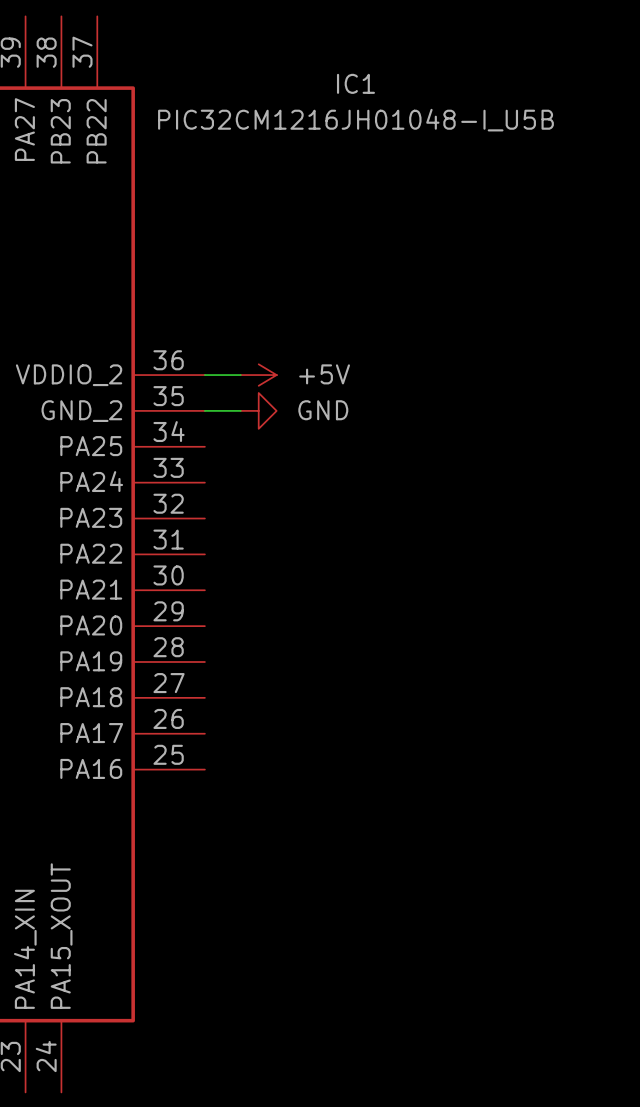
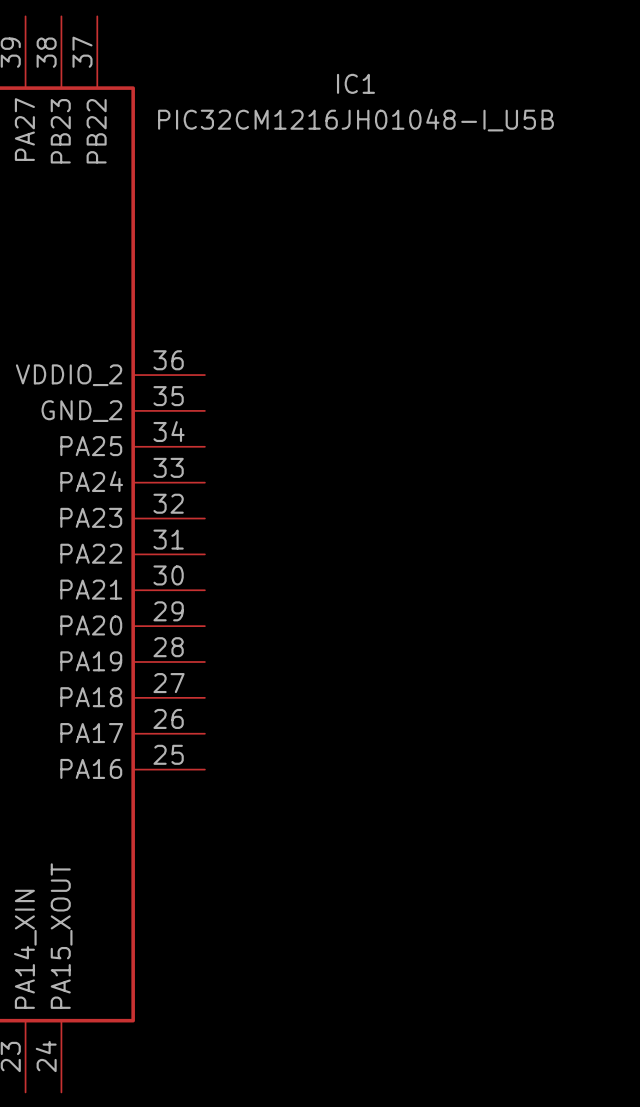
wire: (204, 375) (240, 375) -> none
power symbol: +5V (258, 375) -> none
wire: (204, 410) (240, 410) -> none
power symbol: GND (258, 410) -> none

